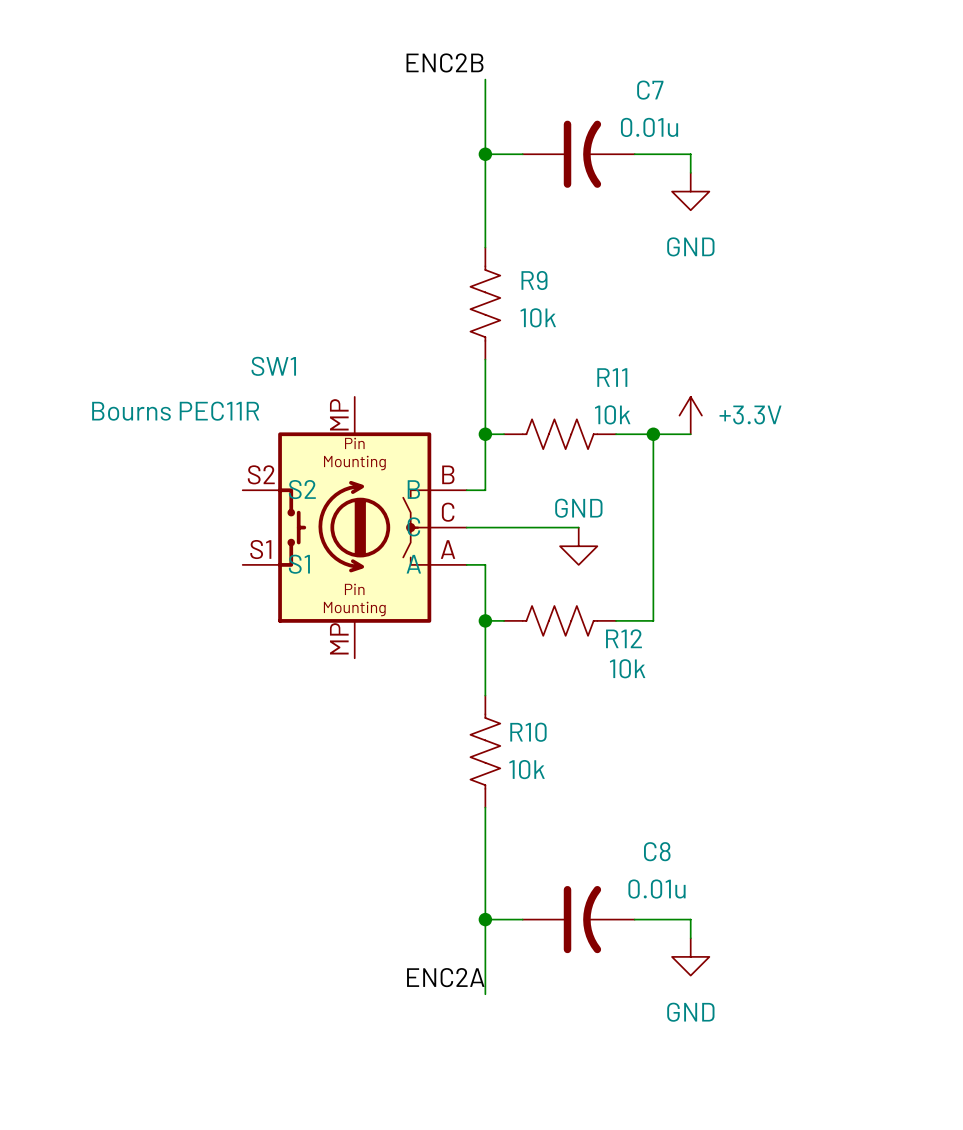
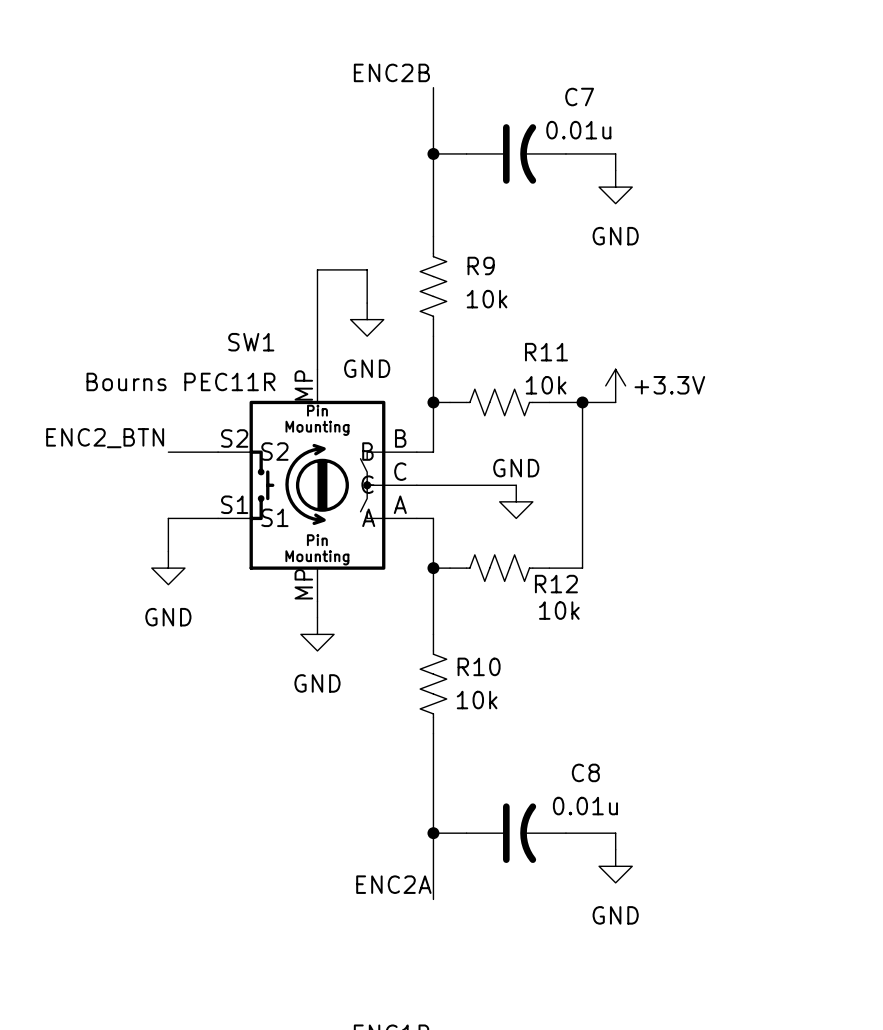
wire: none -> (367, 303) (367, 269) (317, 269) (317, 369)
power symbol: none -> GND (367, 319)
label: none -> ENC2_BTN (105, 438)
wire: none -> (168, 452) (218, 452)
wire: none -> (218, 518) (168, 518) (168, 551)
power symbol: none -> GND (168, 568)
wire: none -> (317, 601) (317, 617)
power symbol: none -> GND (317, 634)

